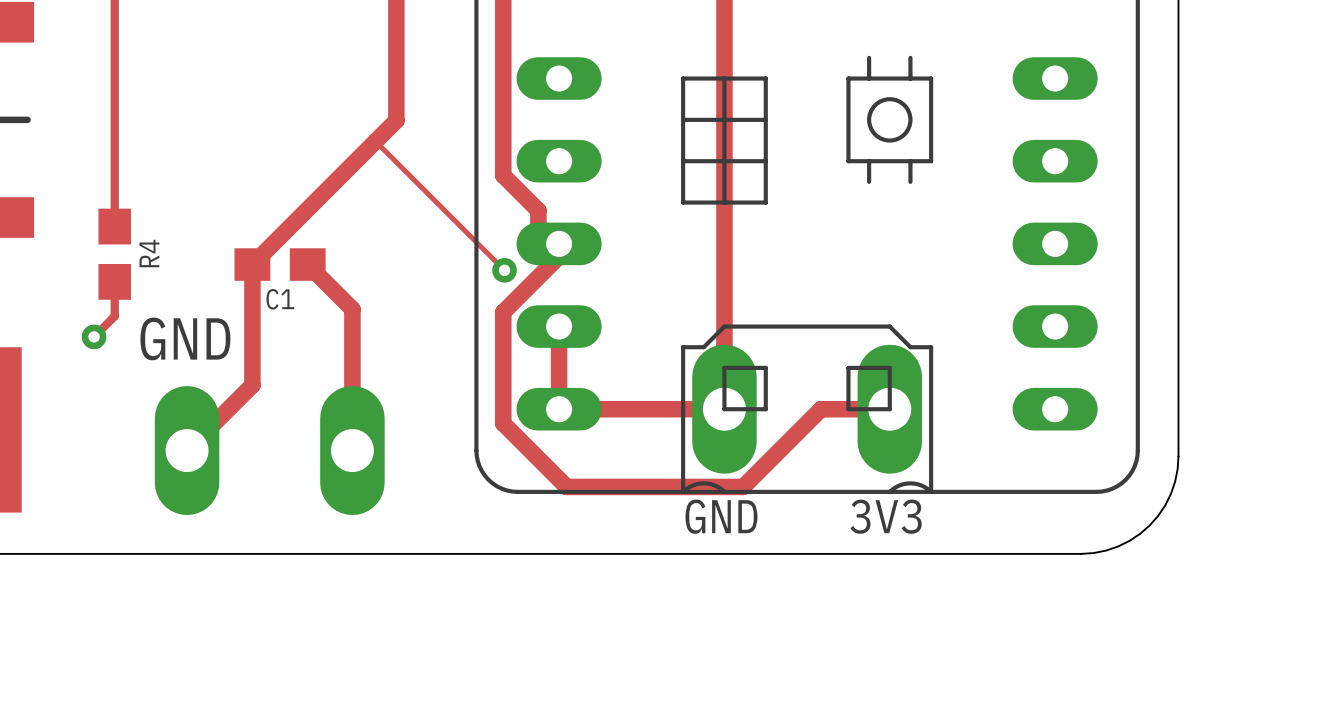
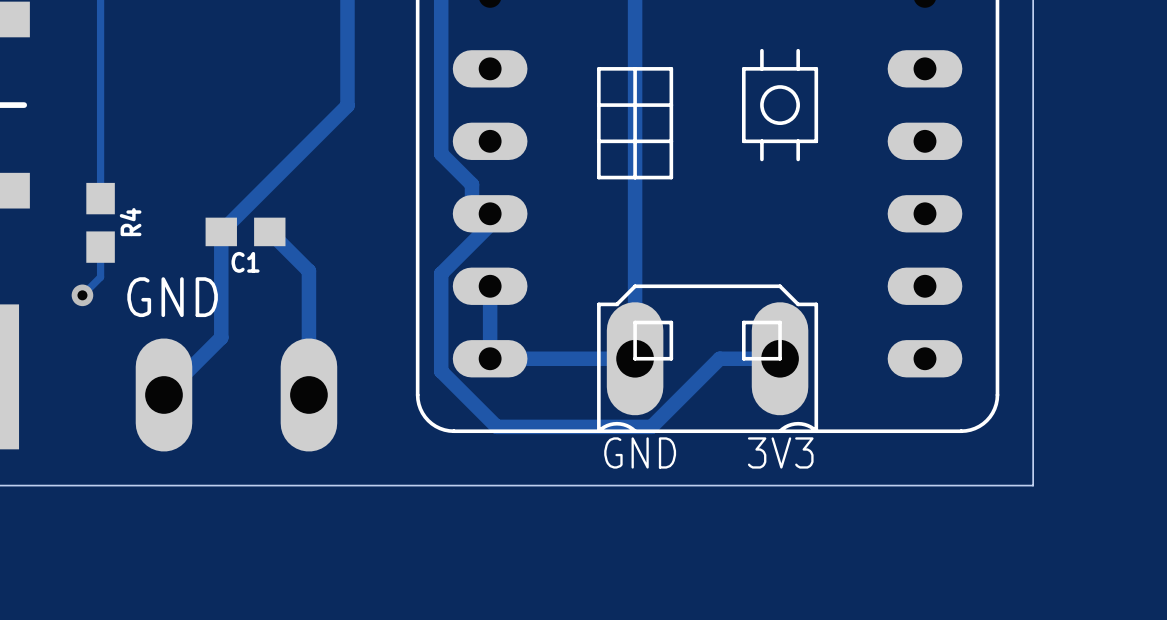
track: (375, 141) (504, 270) -> none
via: (504, 270) -> none
board edge: (1178, 456) (1175, 481) (1171, 493) (1158, 515) (1149, 525) (1140, 533) (1118, 546) (1106, 550) (1080, 553) -> (1033, 399) (1033, 485) (947, 485)

